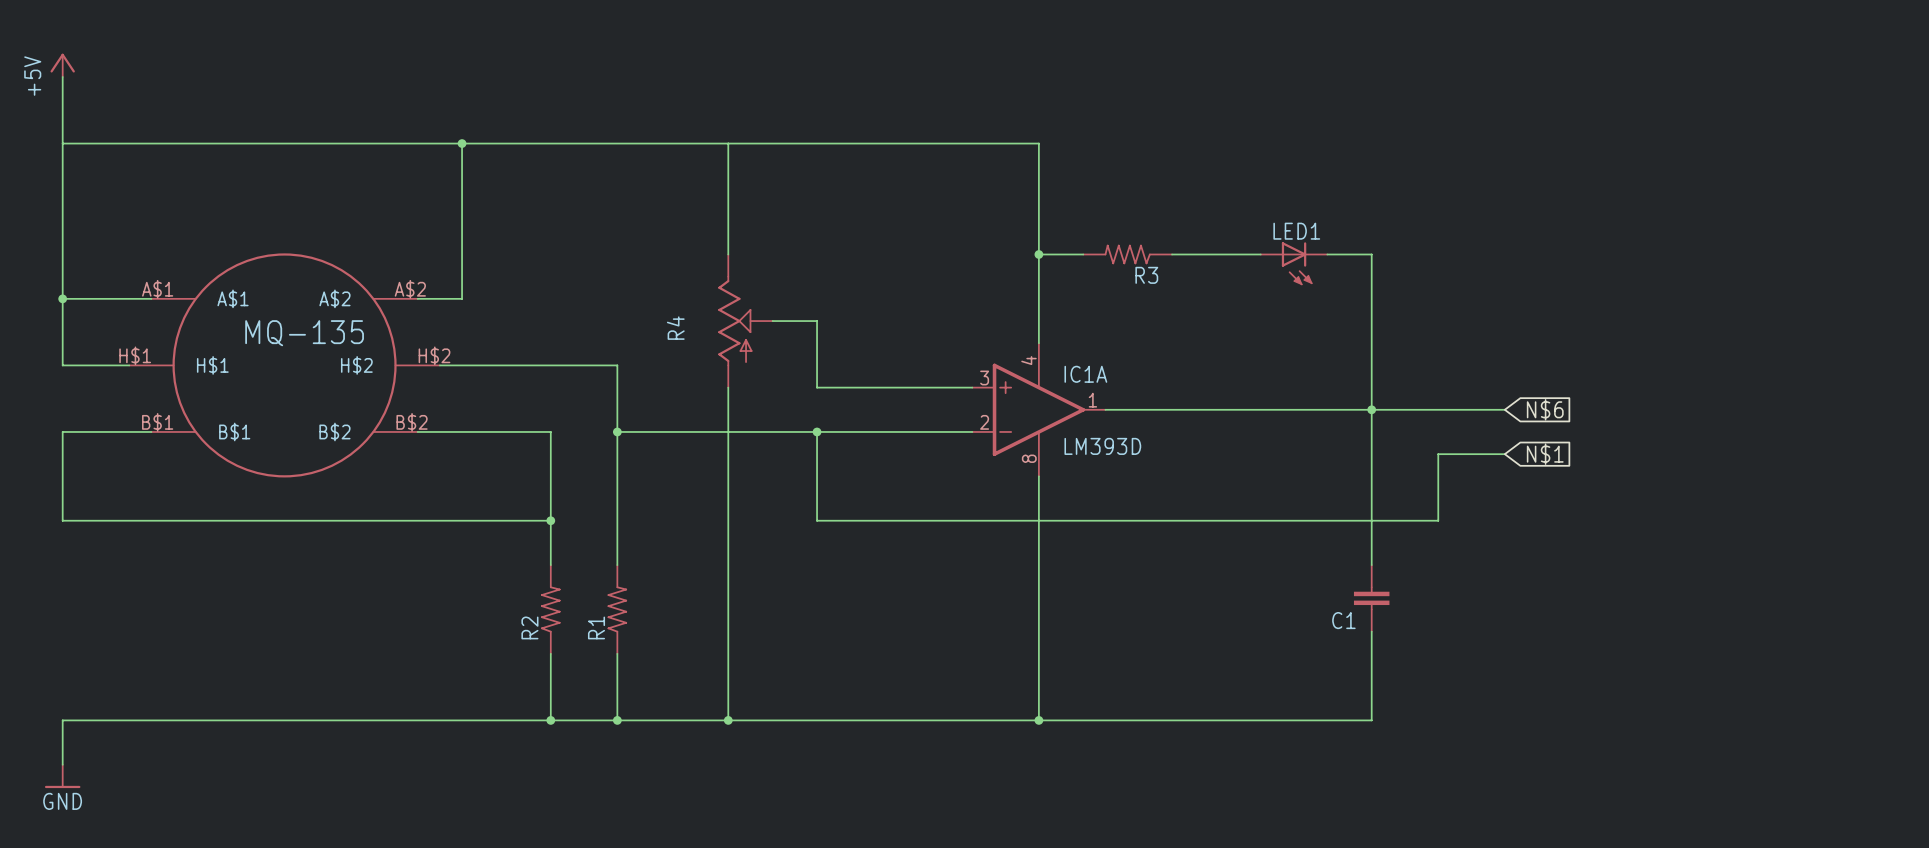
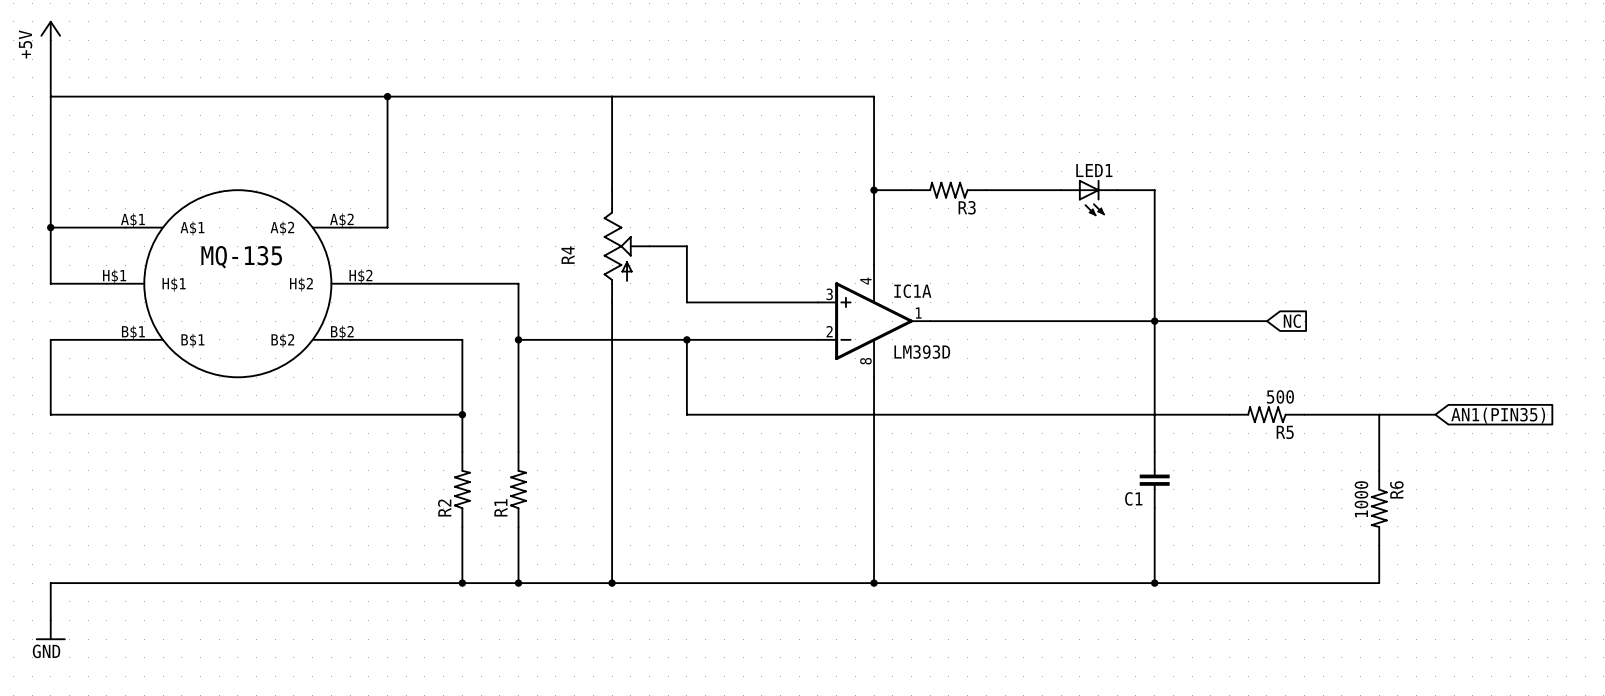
global label: N$6 (1545, 409) -> NC (1292, 321)
wire: (1504, 454) (1438, 454) (1438, 520) -> (1229, 414) (1210, 414)
global label: N$1 (1545, 454) -> none
R5: none -> 500 (1266, 414)
wire: none -> (1304, 414) (1435, 414)
wire: none -> (1379, 414) (1379, 470)
global label: none -> AN1(PIN35) (1498, 415)
R6: none -> 1000 (1379, 508)
wire: none -> (1379, 545) (1379, 583) (1154, 583)
junction: none -> (1154, 583)

